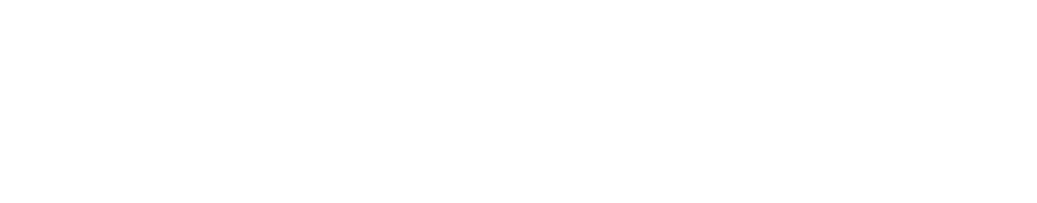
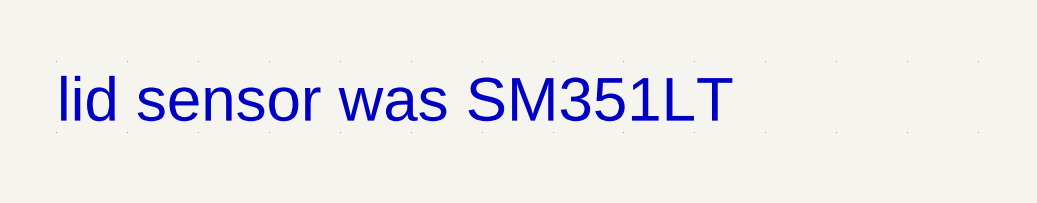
text: none -> lid sensor was SM351LT (396, 98)

